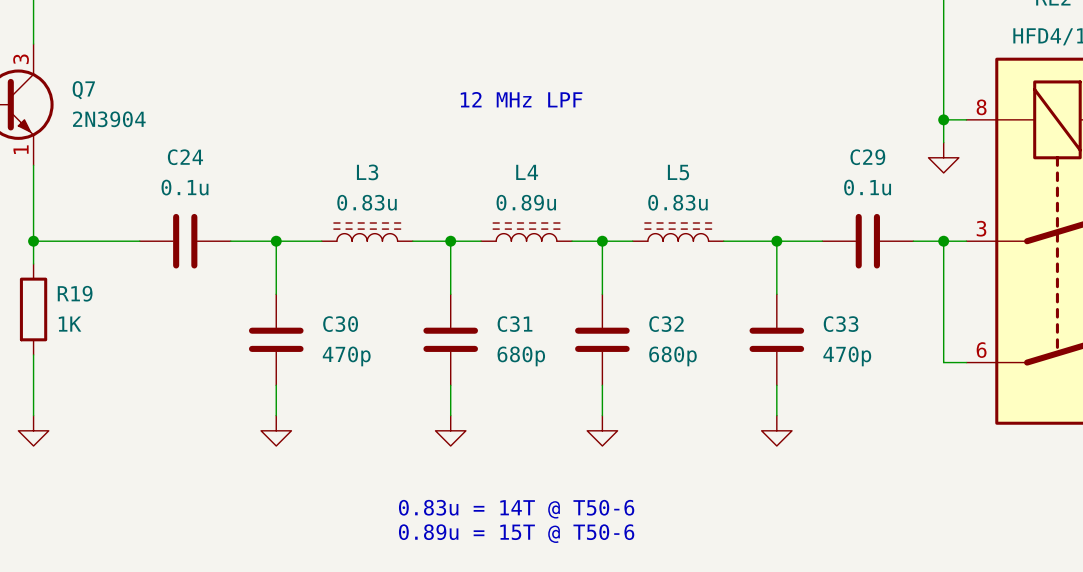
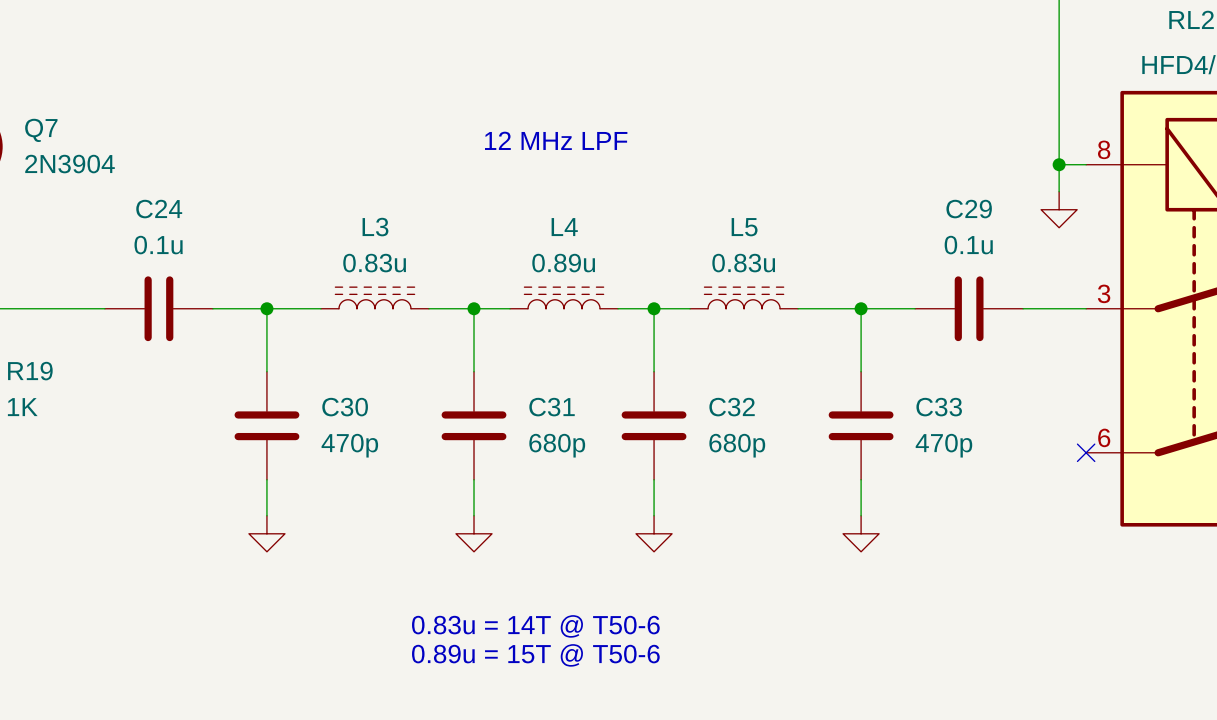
wire: (943, 241) (943, 362) (966, 362) -> none
junction: (943, 241) -> none
no-connect mark: none -> (1086, 452)

